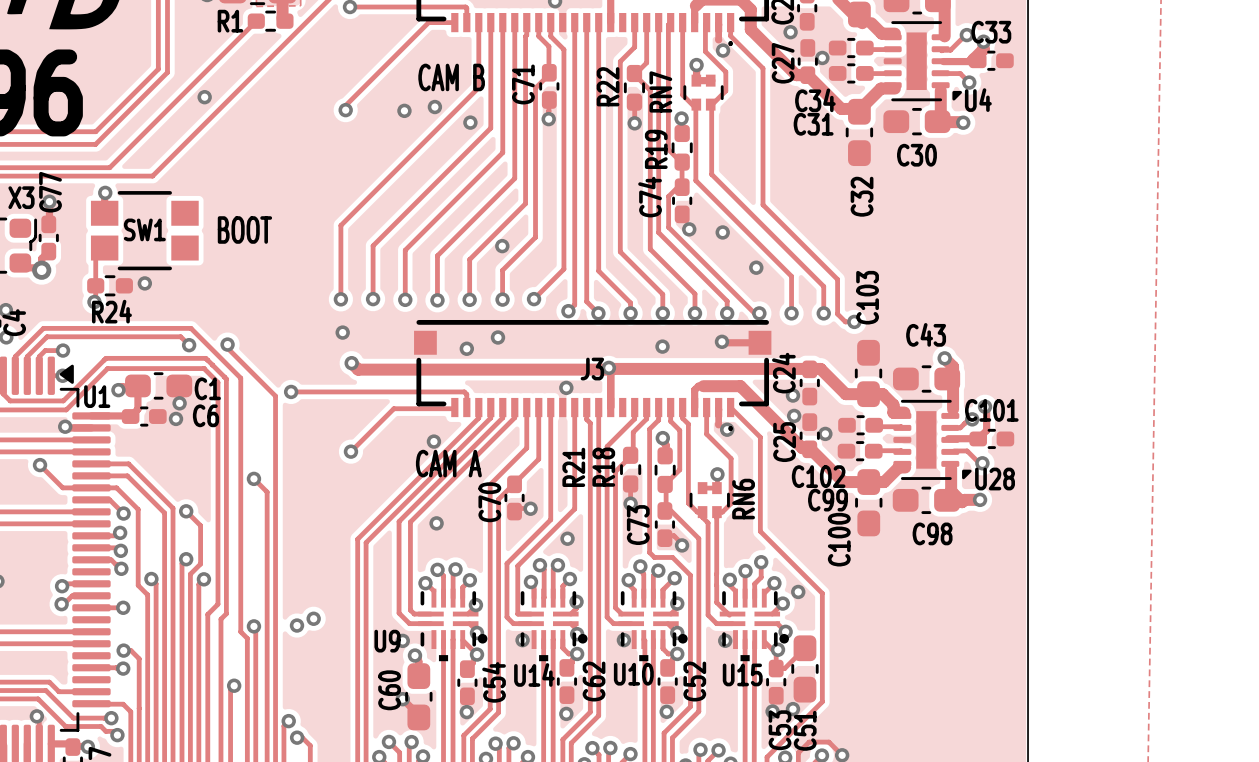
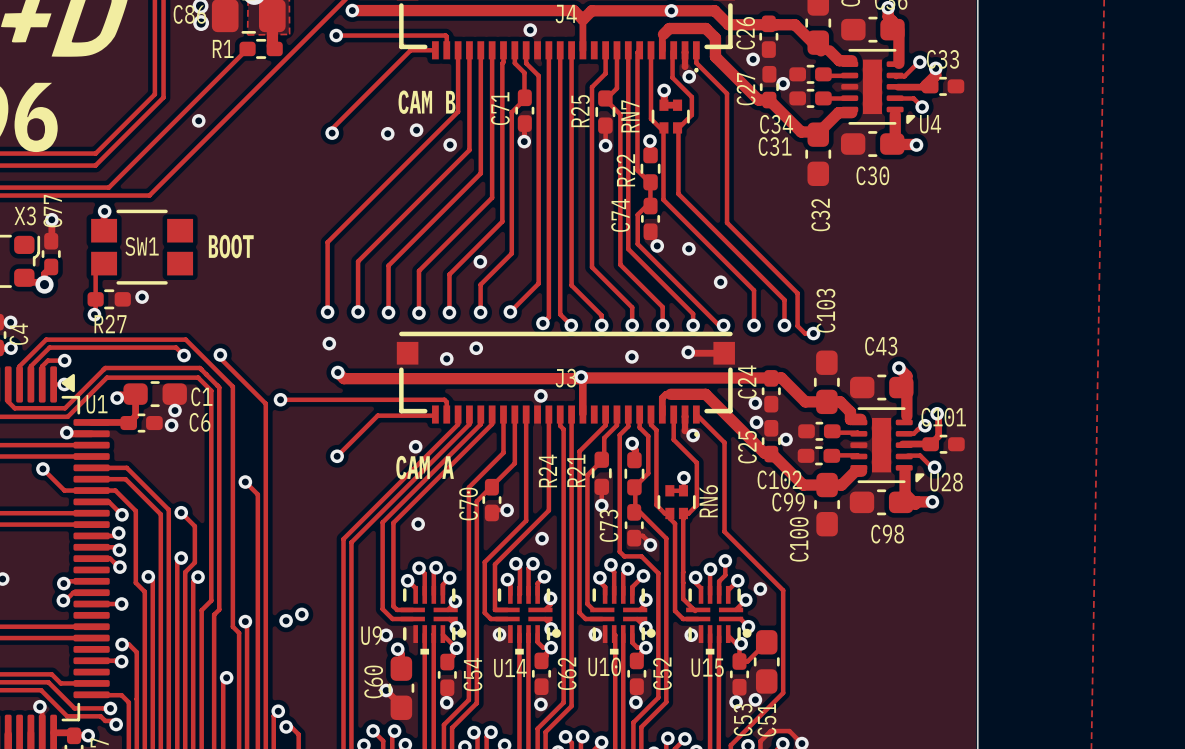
R22 name: R22 (608, 86) -> R25 (580, 111)
R19 name: R19 (656, 149) -> R22 (625, 170)
R24 name: R24 (111, 311) -> R27 (110, 324)
R21 name: R21 (573, 467) -> R24 (547, 470)
R18 name: R18 (603, 467) -> R21 (576, 470)

